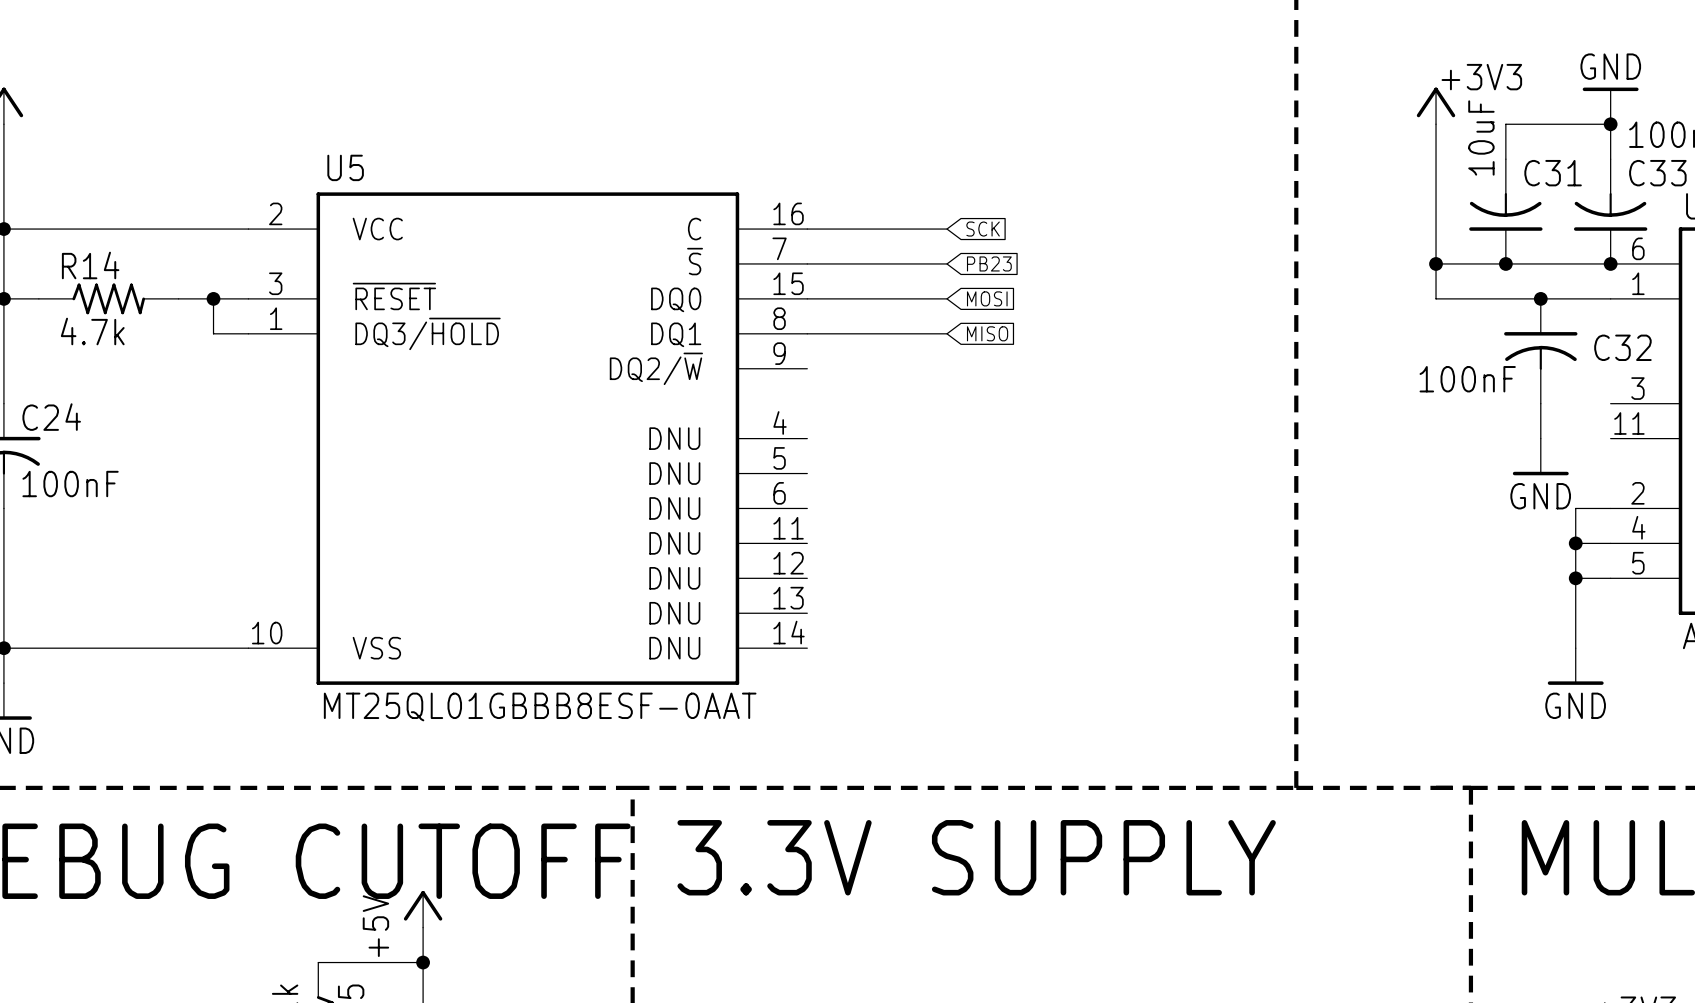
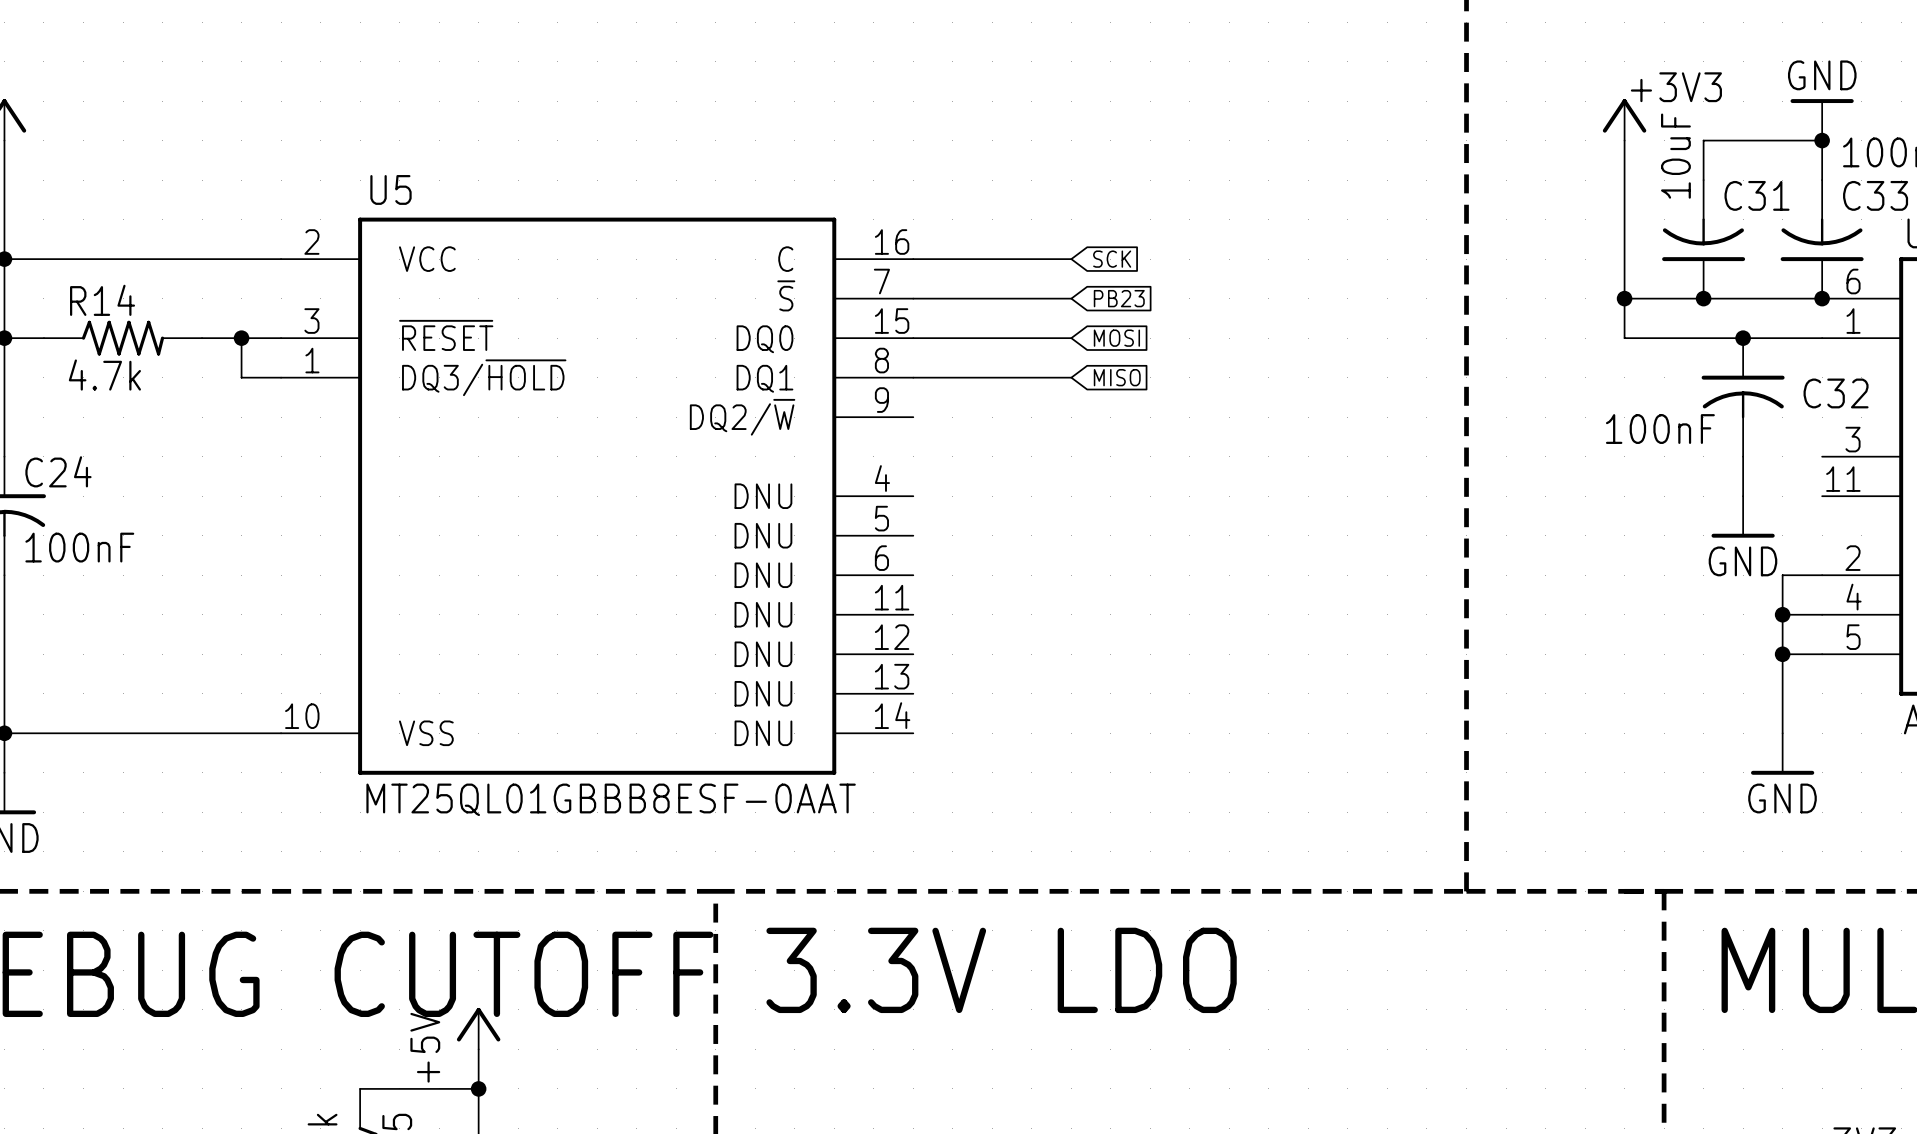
text: 3.3V SUPPLY (976, 857) -> 3.3V LDO (1001, 970)

